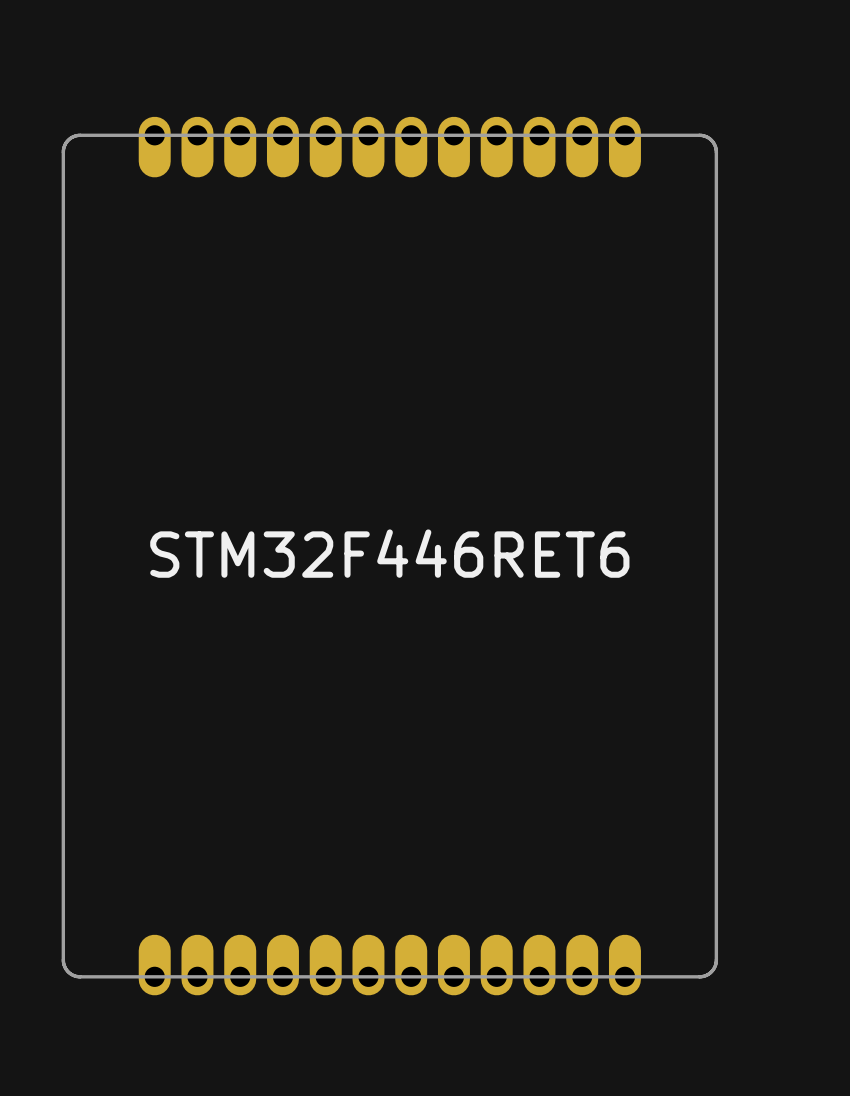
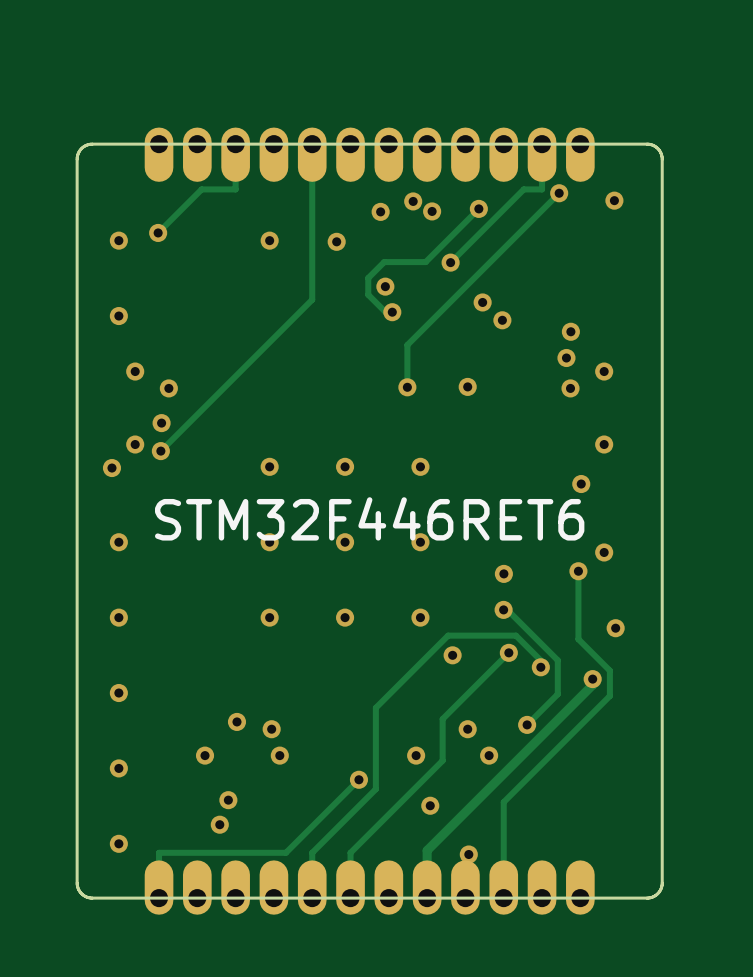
track: none -> (235, 144) (235, 189) (201, 189) (158, 232)
track: none -> (312, 144) (312, 299) (160, 451)
track: none -> (542, 144) (542, 189) (523, 189) (450, 262)
track: none -> (559, 193) (407, 345) (407, 387)
via: none -> (559, 193)
via: none -> (614, 200)
via: none -> (413, 201)
track: none -> (478, 208) (425, 262) (384, 262) (368, 278) (368, 294) (385, 312) (392, 312)
via: none -> (478, 208)
via: none -> (380, 211)
via: none -> (432, 211)
via: none -> (158, 232)
via: none -> (118, 240)
via: none -> (269, 240)
via: none -> (336, 241)
via: none -> (450, 262)
via: none -> (385, 286)
via: none -> (482, 302)
via: none -> (392, 312)
via: none -> (118, 316)
via: none -> (502, 320)
via: none -> (570, 331)
via: none -> (566, 358)
via: none -> (135, 371)
via: none -> (604, 371)
via: none -> (407, 387)
via: none -> (467, 386)
via: none -> (168, 388)
via: none -> (570, 388)
via: none -> (161, 423)
via: none -> (135, 444)
via: none -> (604, 444)
via: none -> (160, 451)
via: none -> (269, 466)
via: none -> (345, 466)
via: none -> (420, 466)
via: none -> (111, 468)
via: none -> (581, 484)
via: none -> (118, 542)
via: none -> (269, 542)
via: none -> (345, 542)
via: none -> (420, 542)
via: none -> (604, 552)
track: none -> (578, 571) (578, 639) (609, 670) (609, 696) (503, 802) (503, 898)
via: none -> (578, 571)
via: none -> (503, 573)
track: none -> (503, 609) (507, 609) (557, 660) (557, 694) (527, 724)
via: none -> (503, 609)
via: none -> (118, 617)
via: none -> (269, 617)
via: none -> (345, 617)
via: none -> (420, 617)
via: none -> (615, 628)
track: none -> (508, 652) (442, 719) (442, 760) (350, 852) (350, 898)
via: none -> (508, 652)
via: none -> (452, 655)
track: none -> (540, 667) (540, 660) (515, 635) (448, 635) (375, 707) (375, 789) (312, 852) (312, 898)
via: none -> (540, 667)
track: none -> (592, 679) (592, 685) (427, 850) (427, 898)
via: none -> (592, 679)
via: none -> (118, 693)
via: none -> (236, 721)
via: none -> (527, 724)
via: none -> (271, 729)
via: none -> (467, 729)
via: none -> (205, 755)
via: none -> (279, 755)
via: none -> (416, 755)
via: none -> (489, 755)
via: none -> (118, 768)
track: none -> (358, 779) (285, 852) (159, 852) (159, 898)
via: none -> (358, 779)
via: none -> (228, 800)
via: none -> (430, 805)
via: none -> (219, 824)
via: none -> (118, 843)
via: none -> (468, 854)

